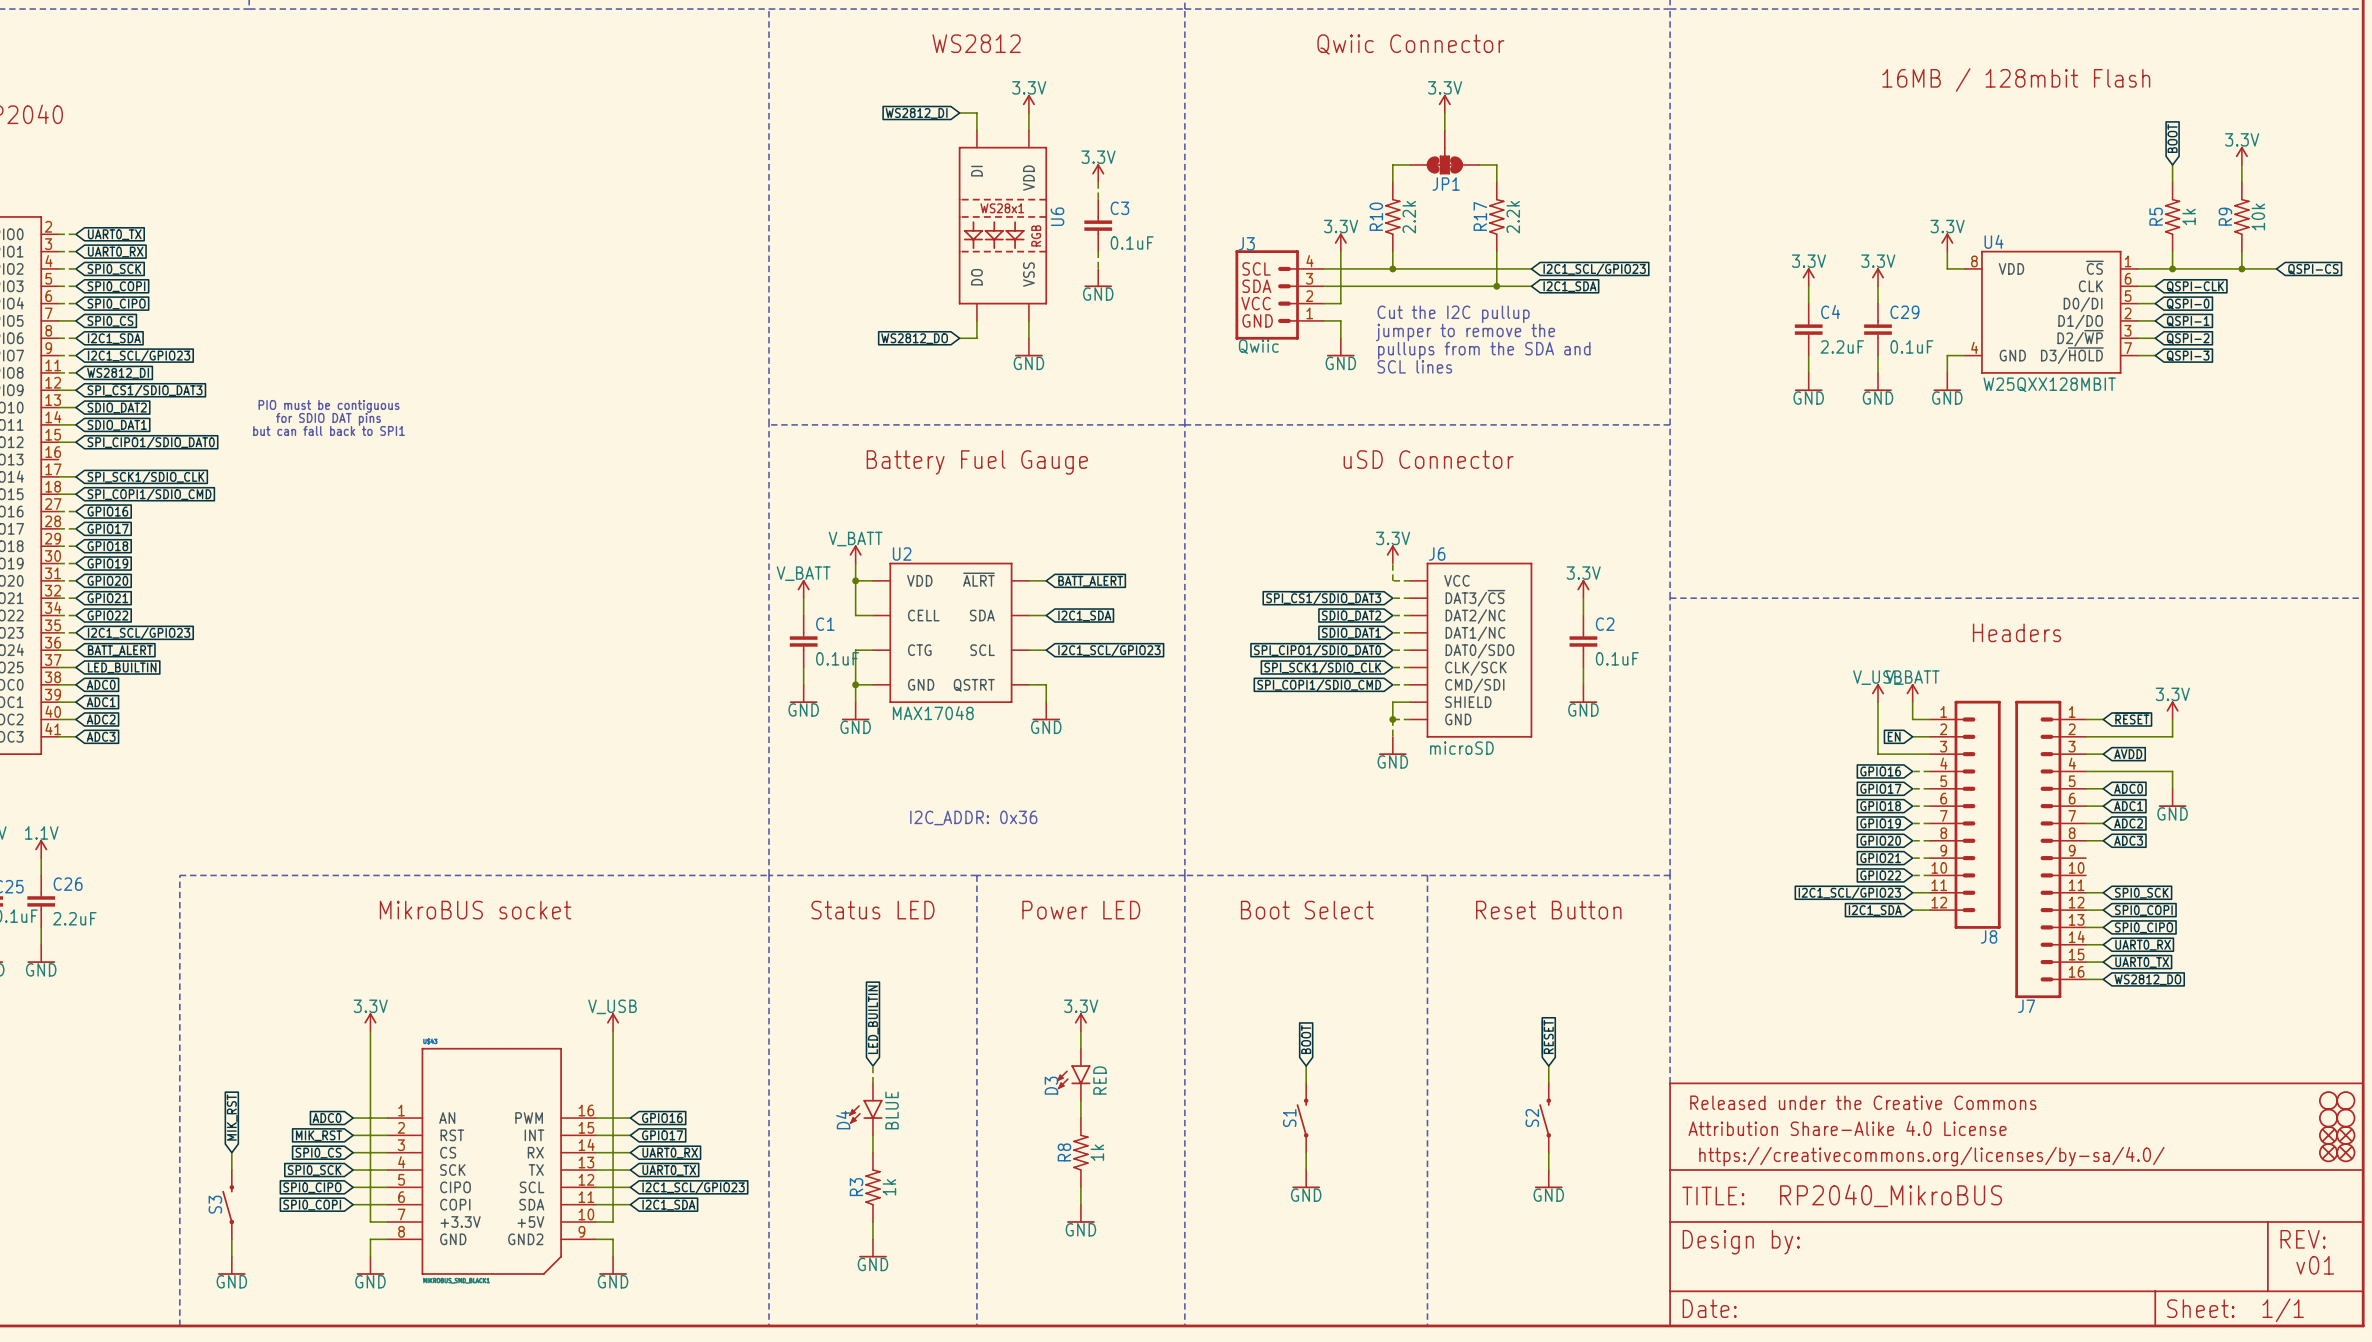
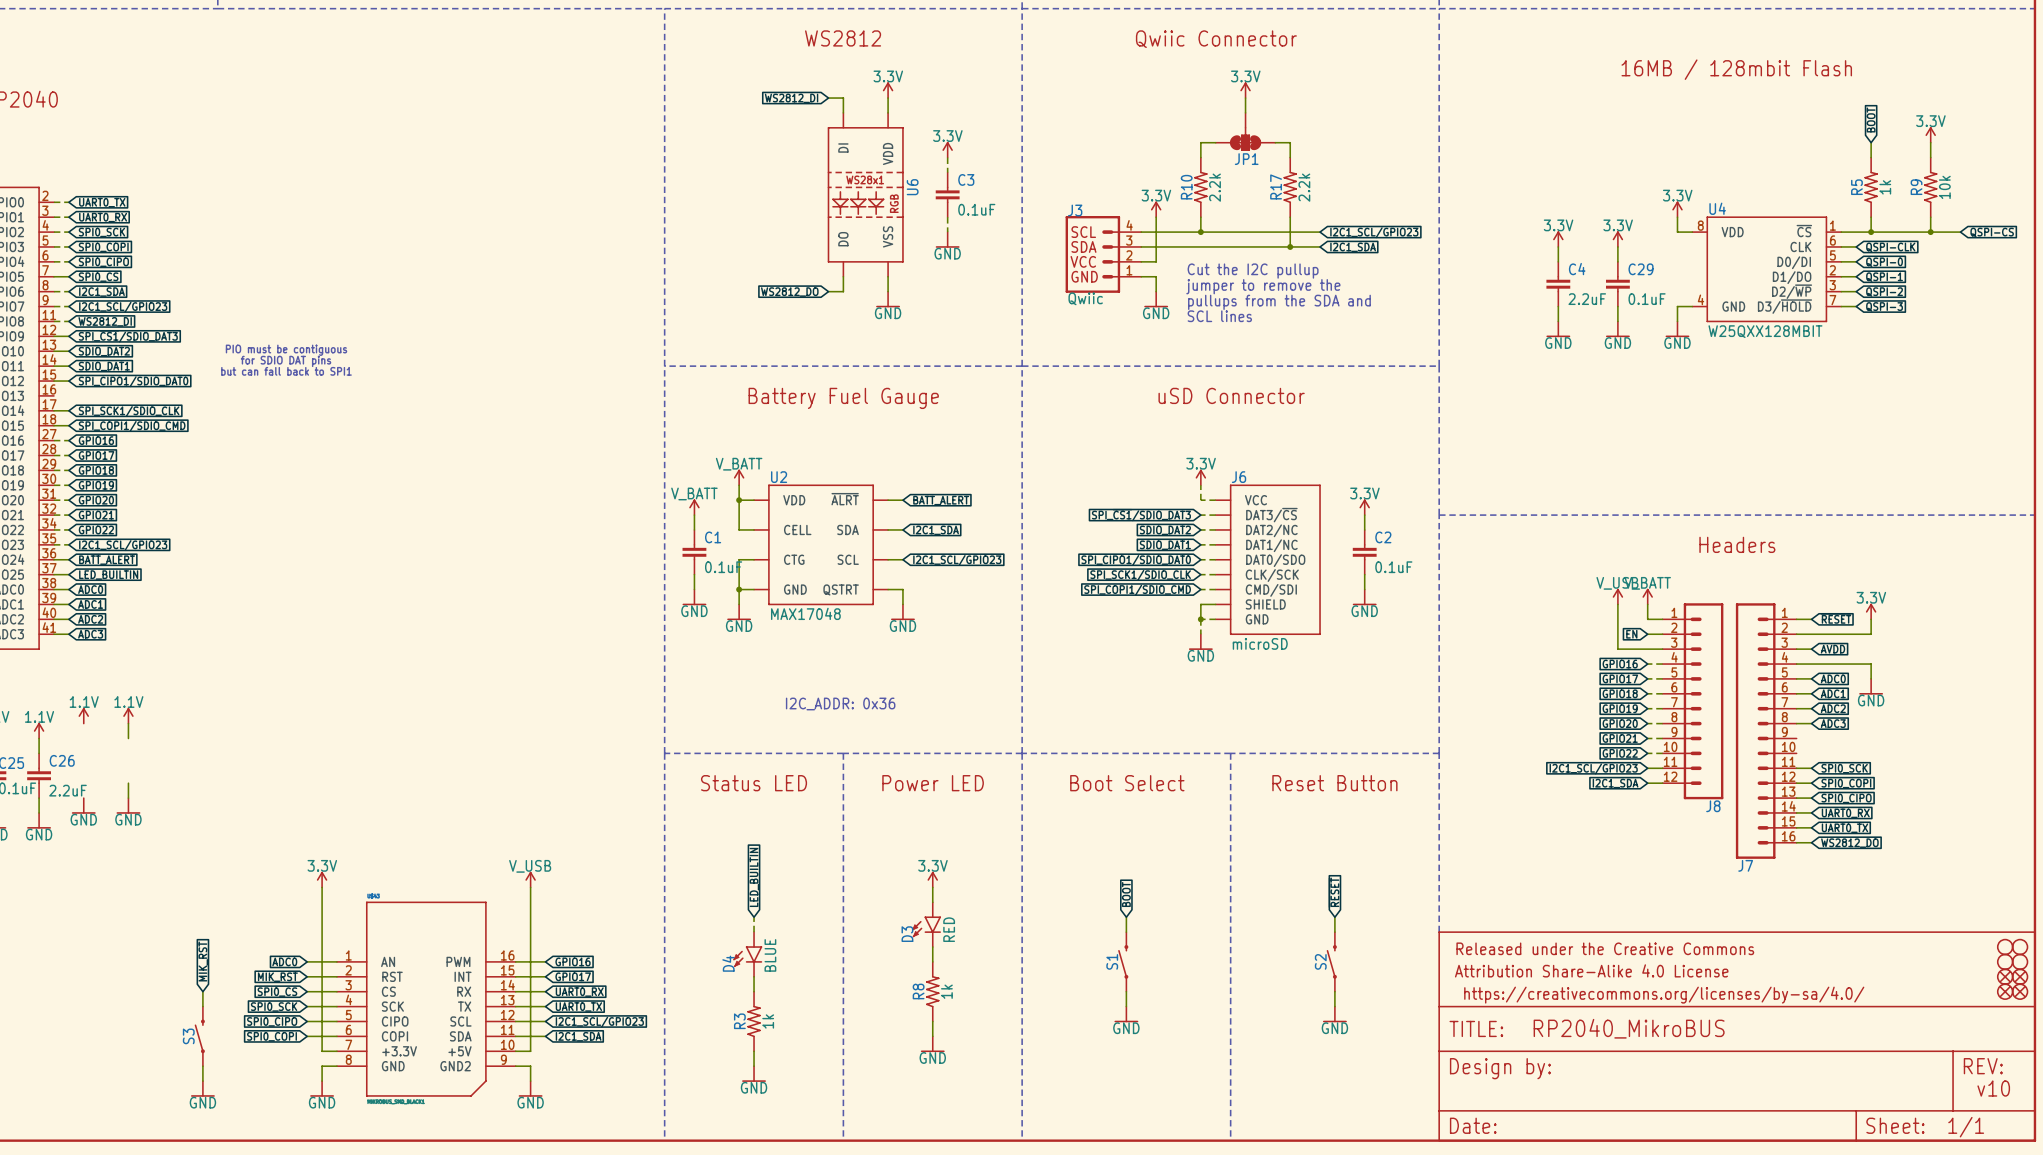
power symbol: none -> 1.1V (83, 715)
power symbol: none -> 1.1V (128, 715)
wire: none -> (128, 723) (128, 738)
line: (769, 875) (179, 875) (179, 1325) -> none
wire: none -> (128, 783) (128, 798)
text: MikroBUS socket (475, 910) -> none
power symbol: none -> GND (83, 805)
power symbol: none -> GND (128, 805)
text: v01 (2315, 1265) -> v10 (1993, 1088)

